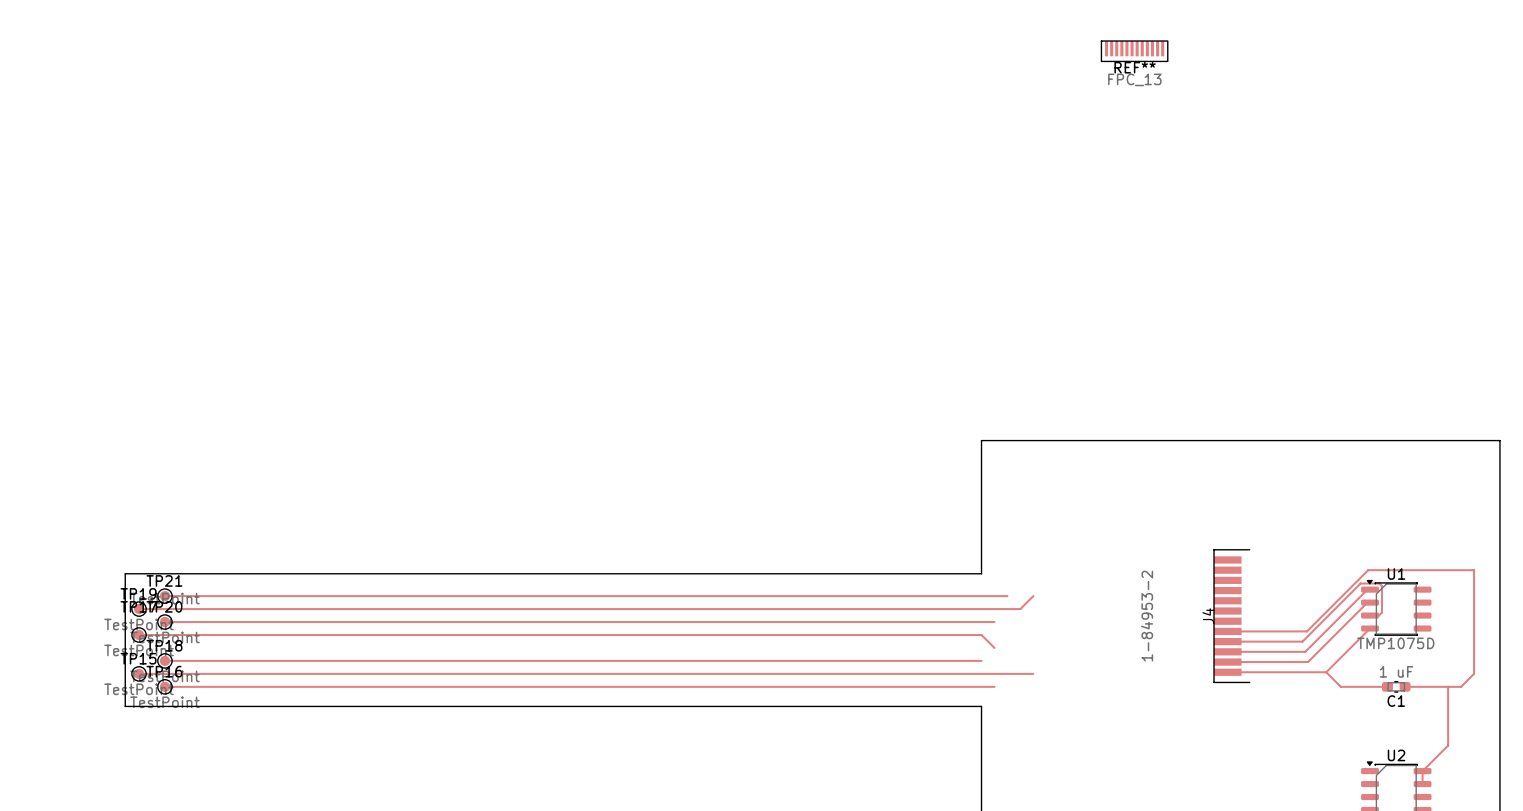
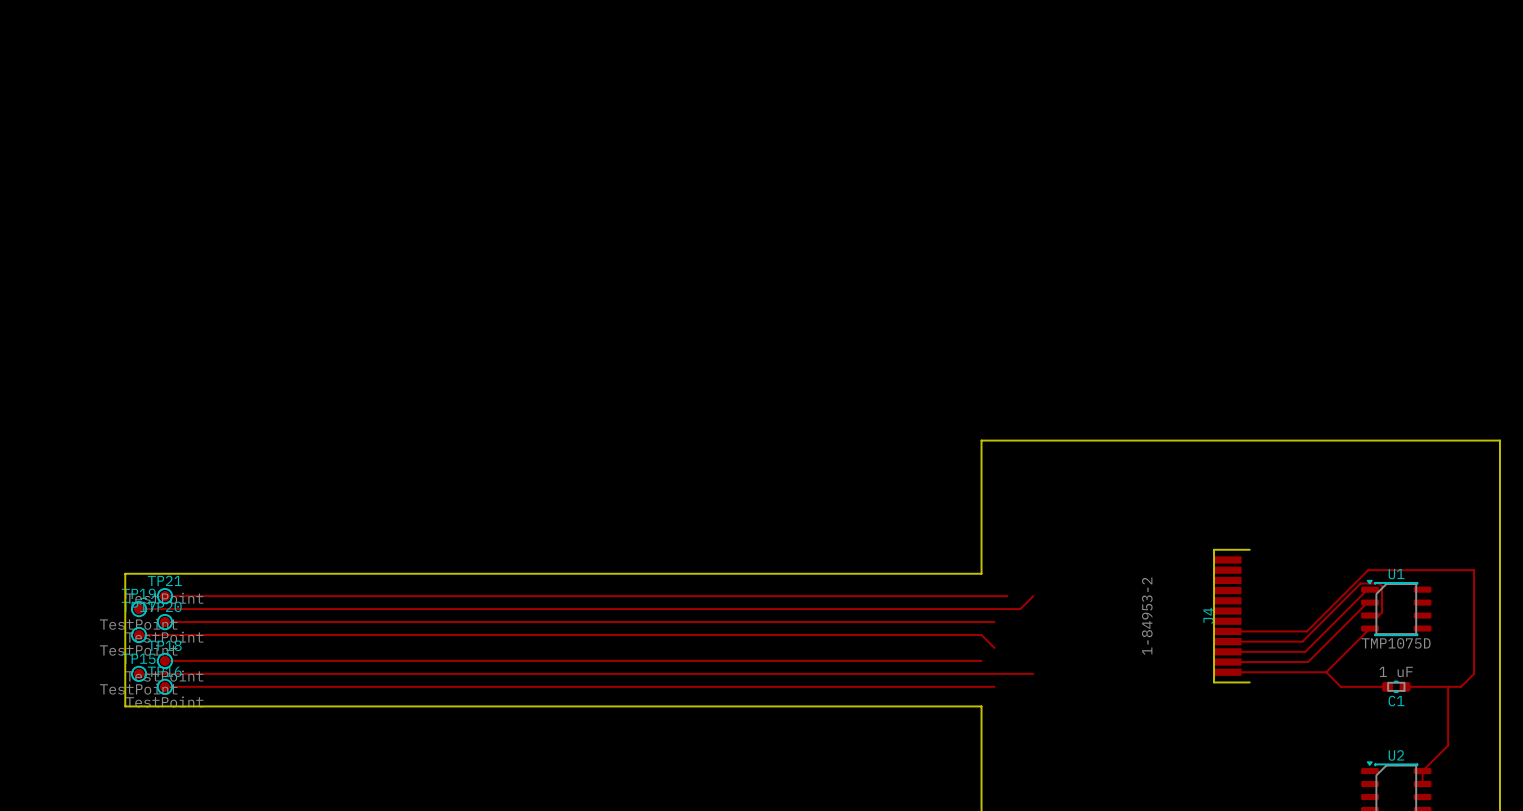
REF**: FPC_13 (1134, 51) -> none

